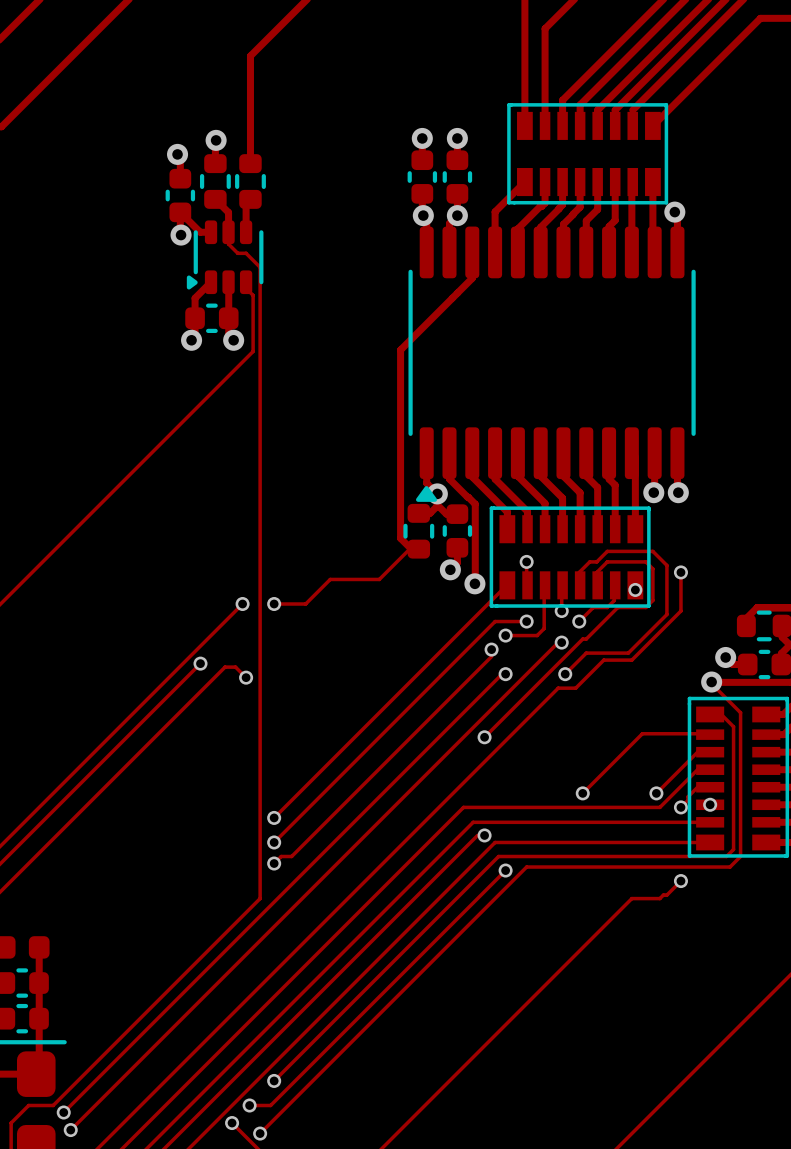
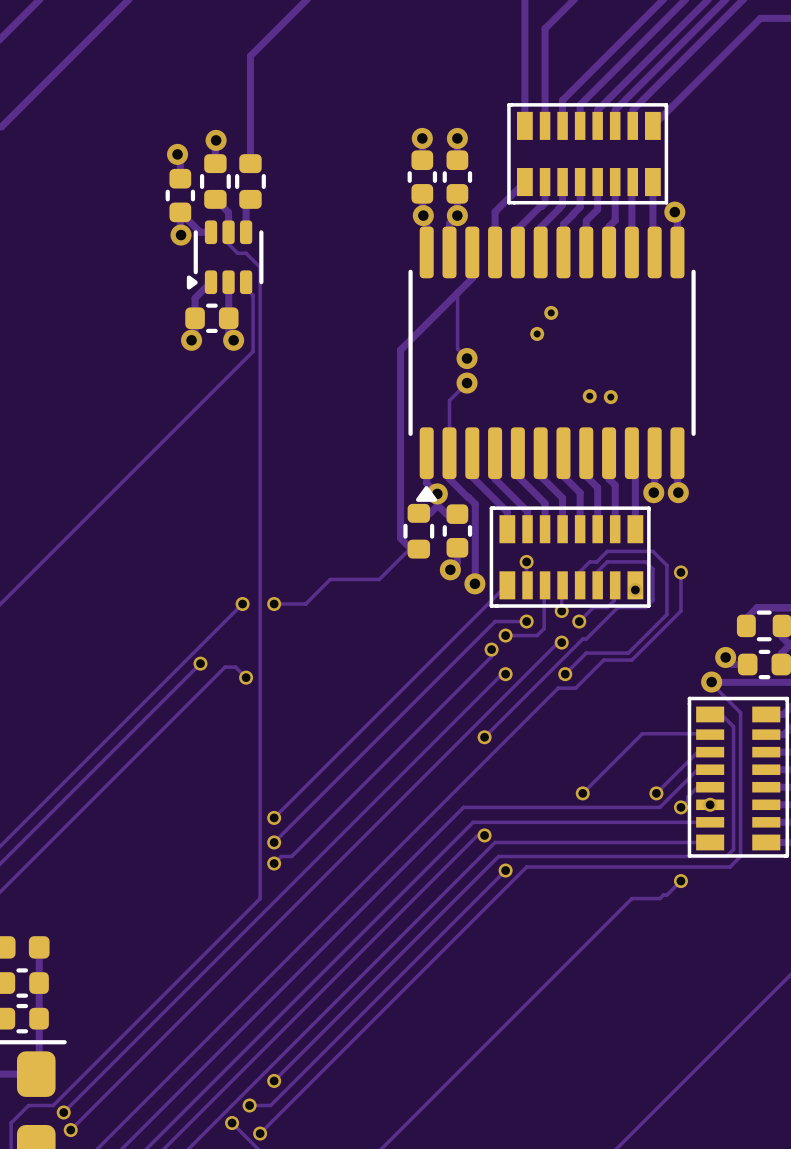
track: none -> (457, 292) (457, 349) (467, 358)
via: none -> (551, 312)
via: none -> (537, 333)
via: none -> (467, 358)
track: none -> (467, 383) (449, 400) (449, 453)
via: none -> (467, 383)
via: none -> (589, 396)
via: none -> (610, 397)

